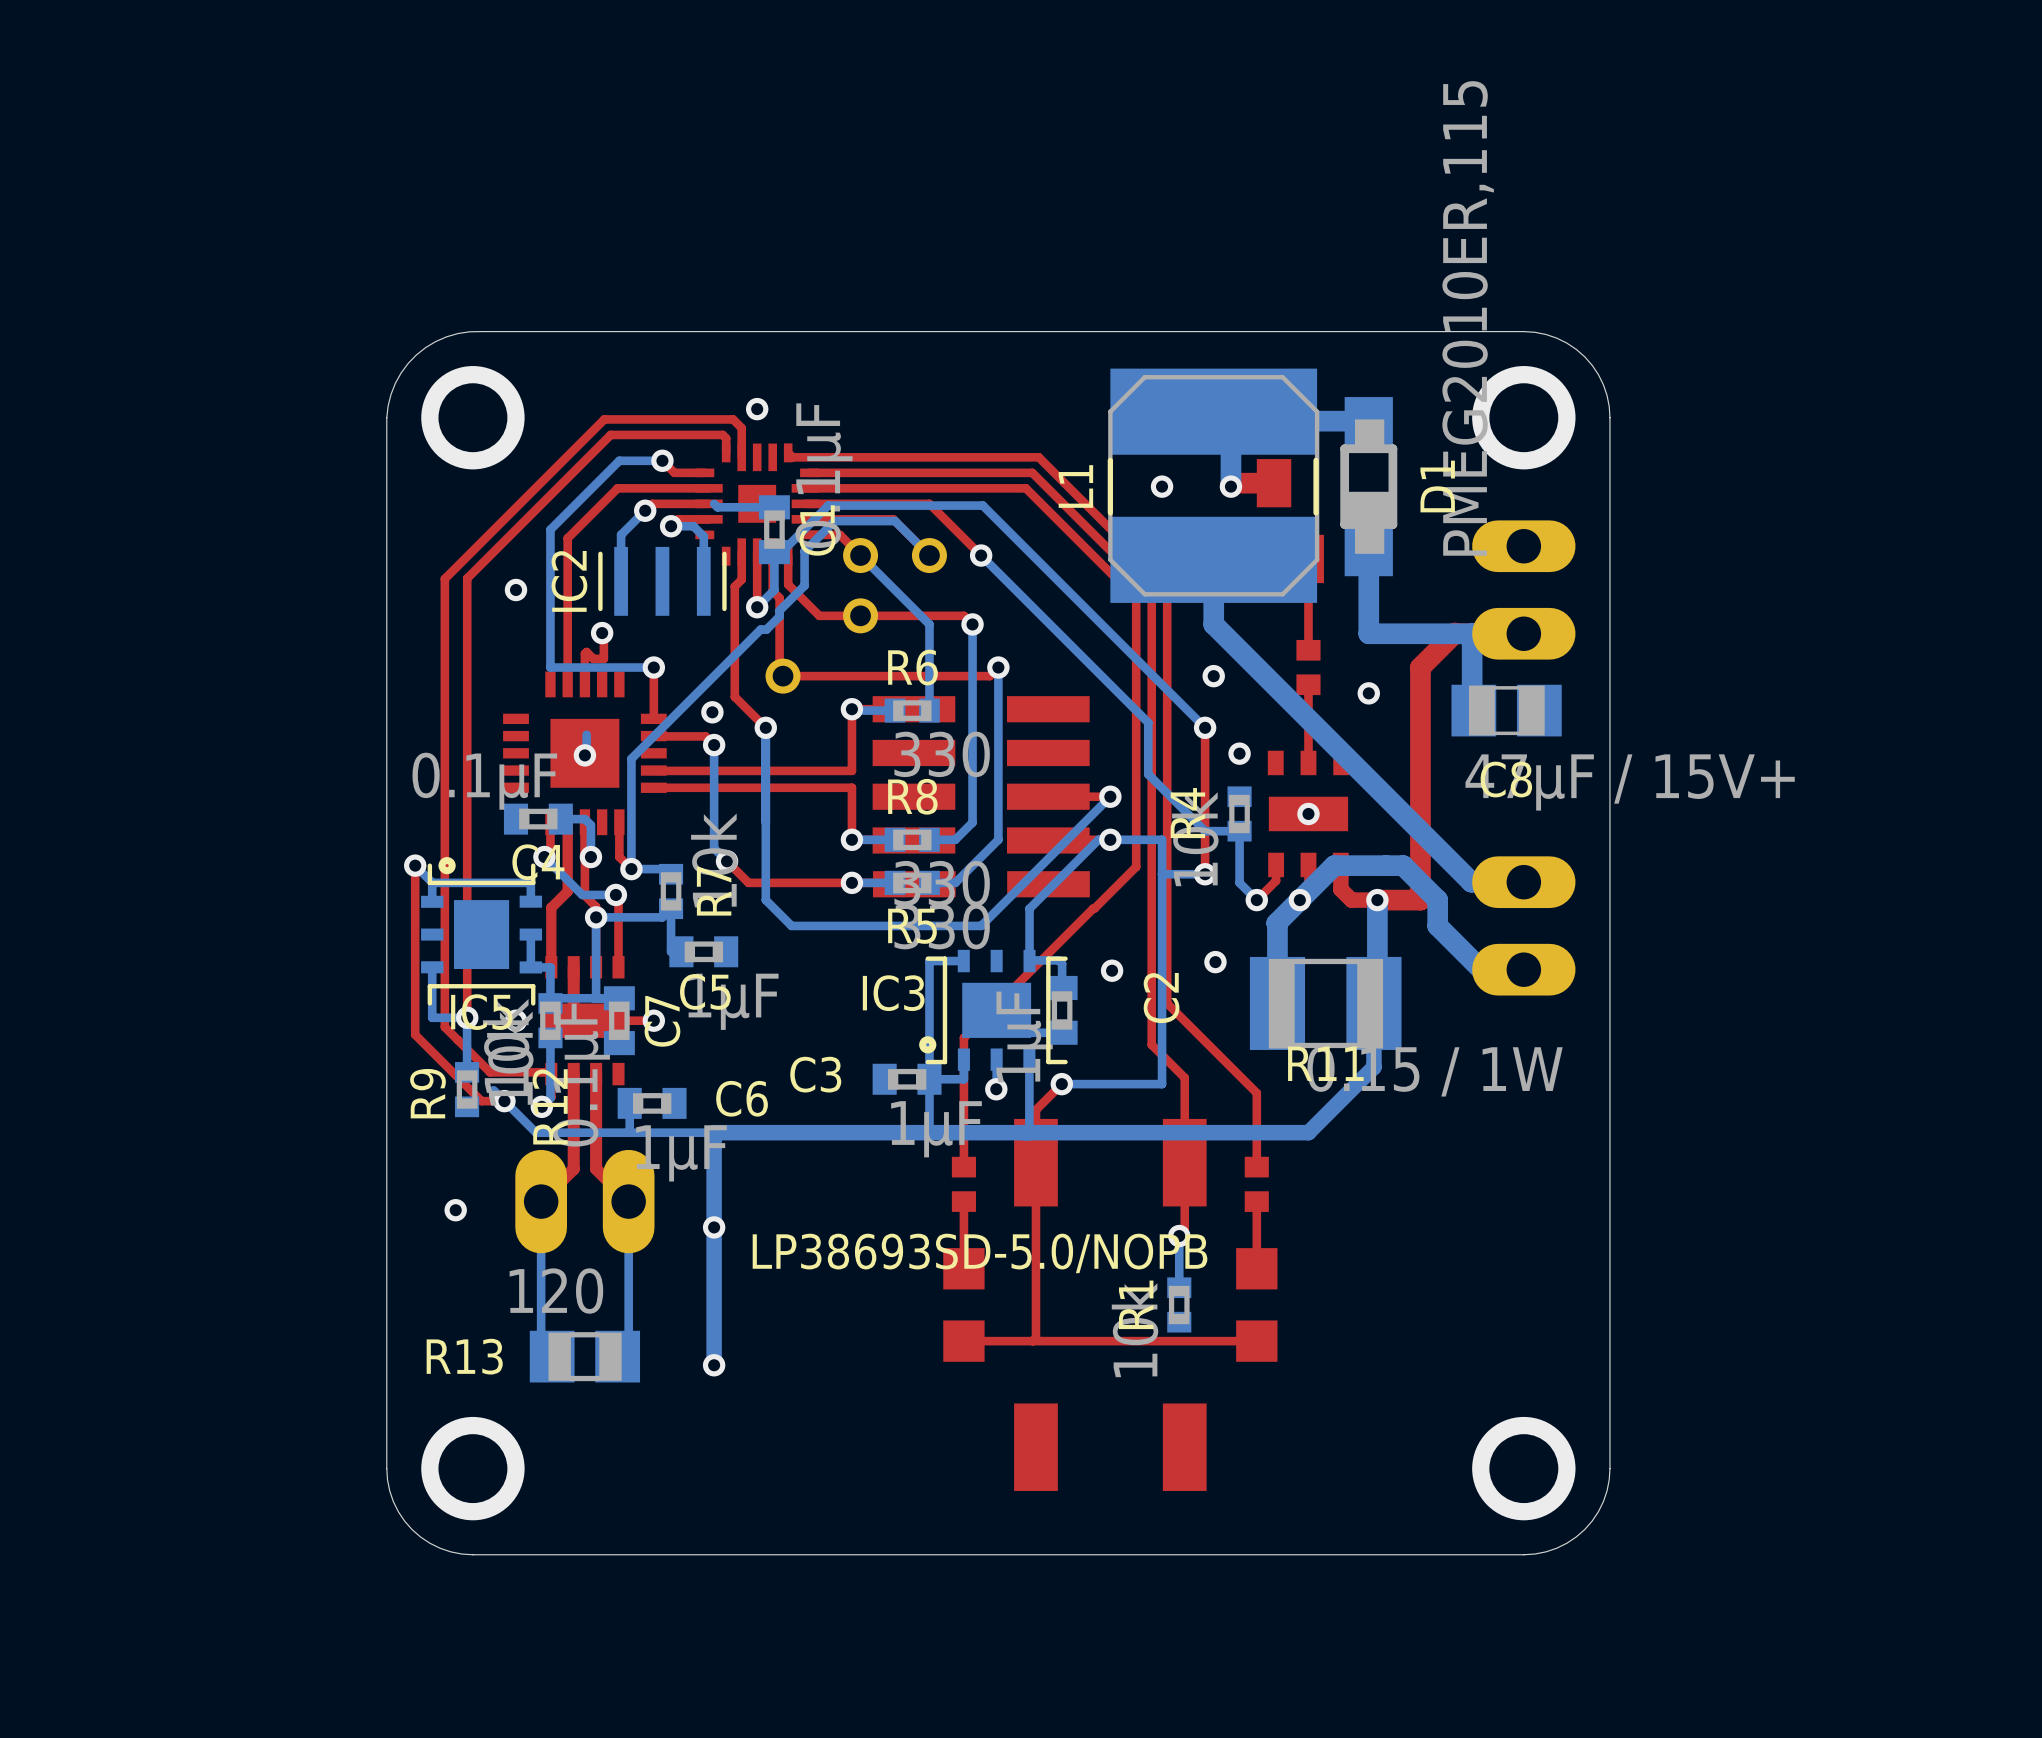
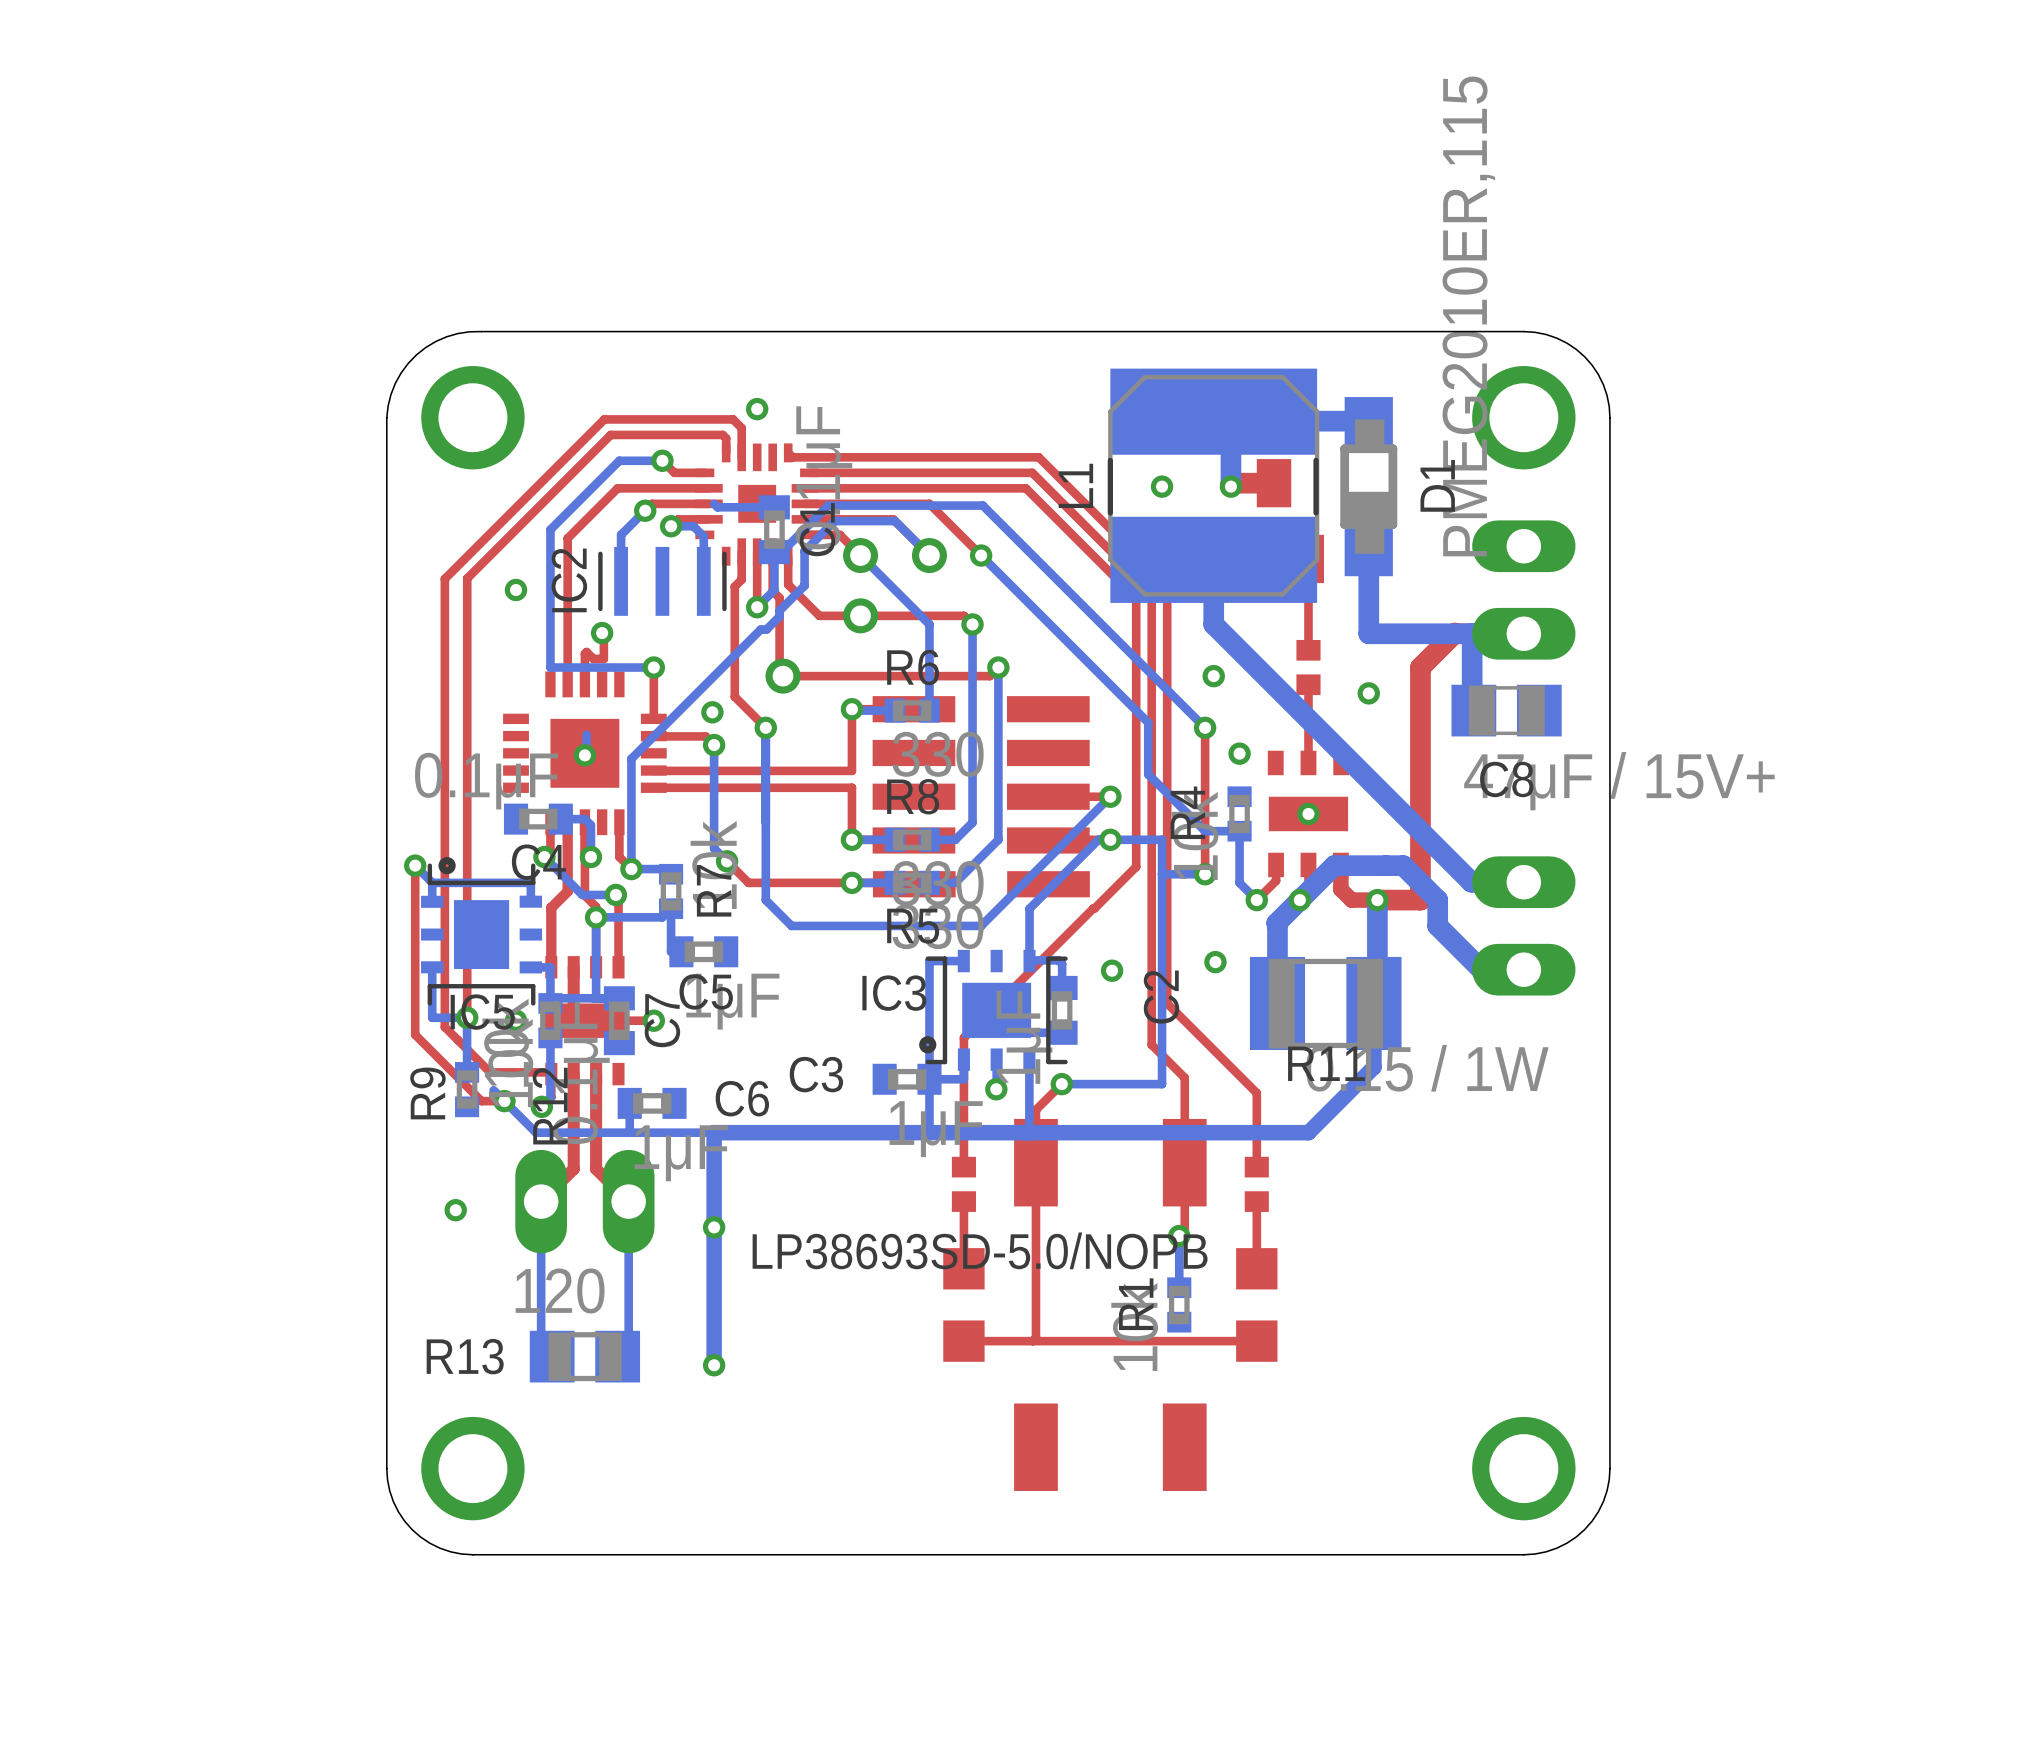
bottom track: (530, 934) (530, 967) -> none

